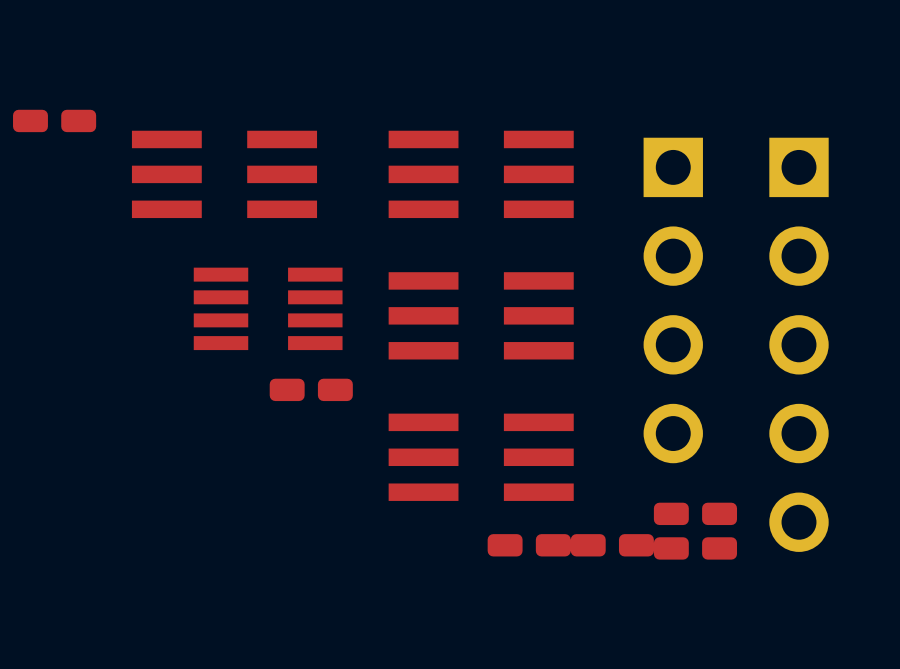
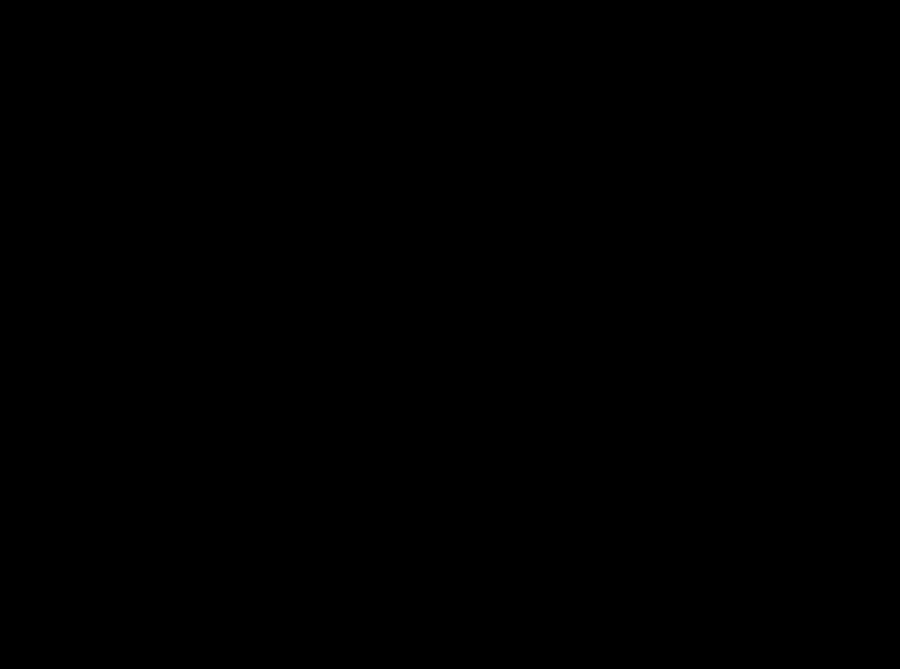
part: (54, 120) -> none
part: (224, 174) -> none
part: (481, 174) -> none
part: (673, 300) -> none
part: (268, 308) -> none
part: (481, 315) -> none
part: (799, 344) -> none
part: (311, 389) -> none
part: (481, 457) -> none
part: (695, 513) -> none
part: (529, 545) -> none
part: (612, 545) -> none
part: (695, 548) -> none

